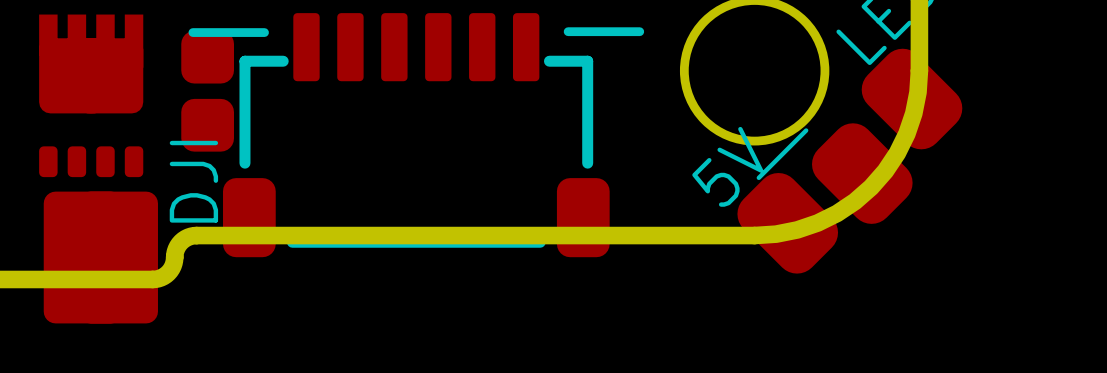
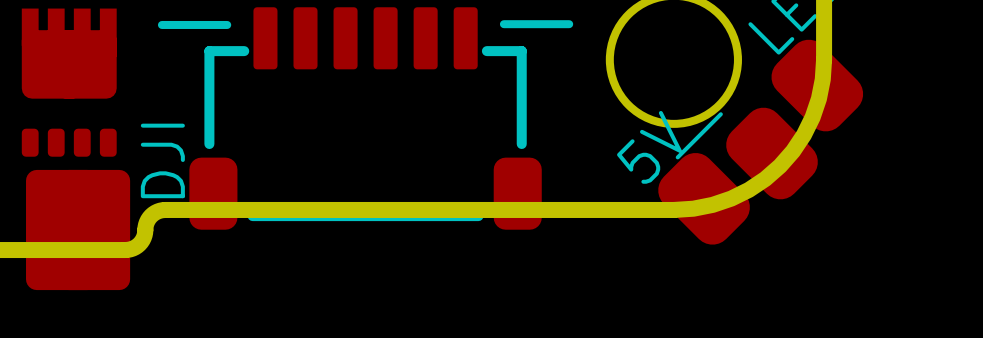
part: (207, 57) -> none
part: (207, 125) -> none

